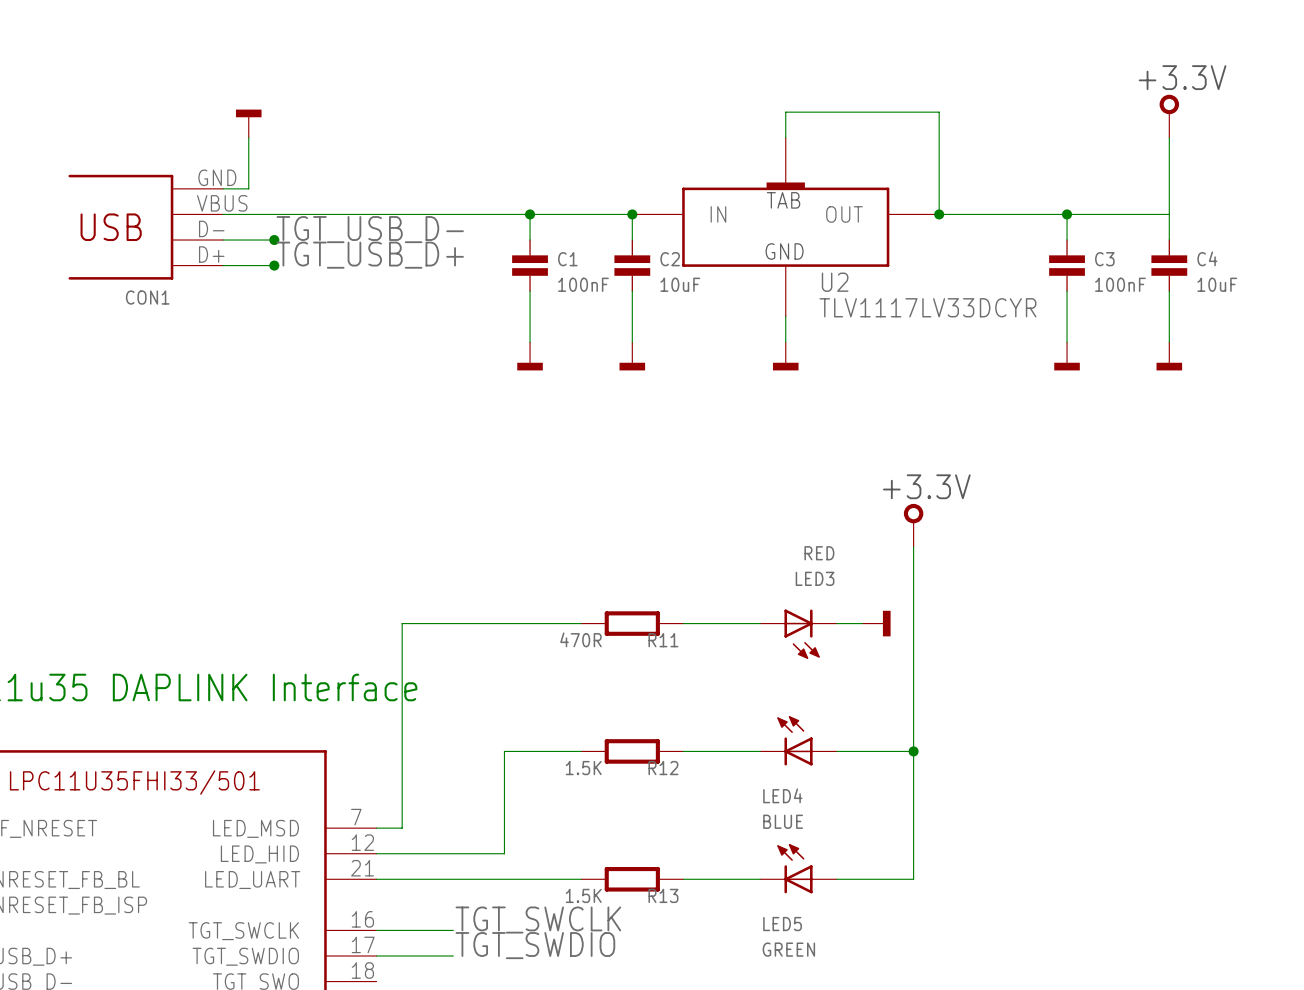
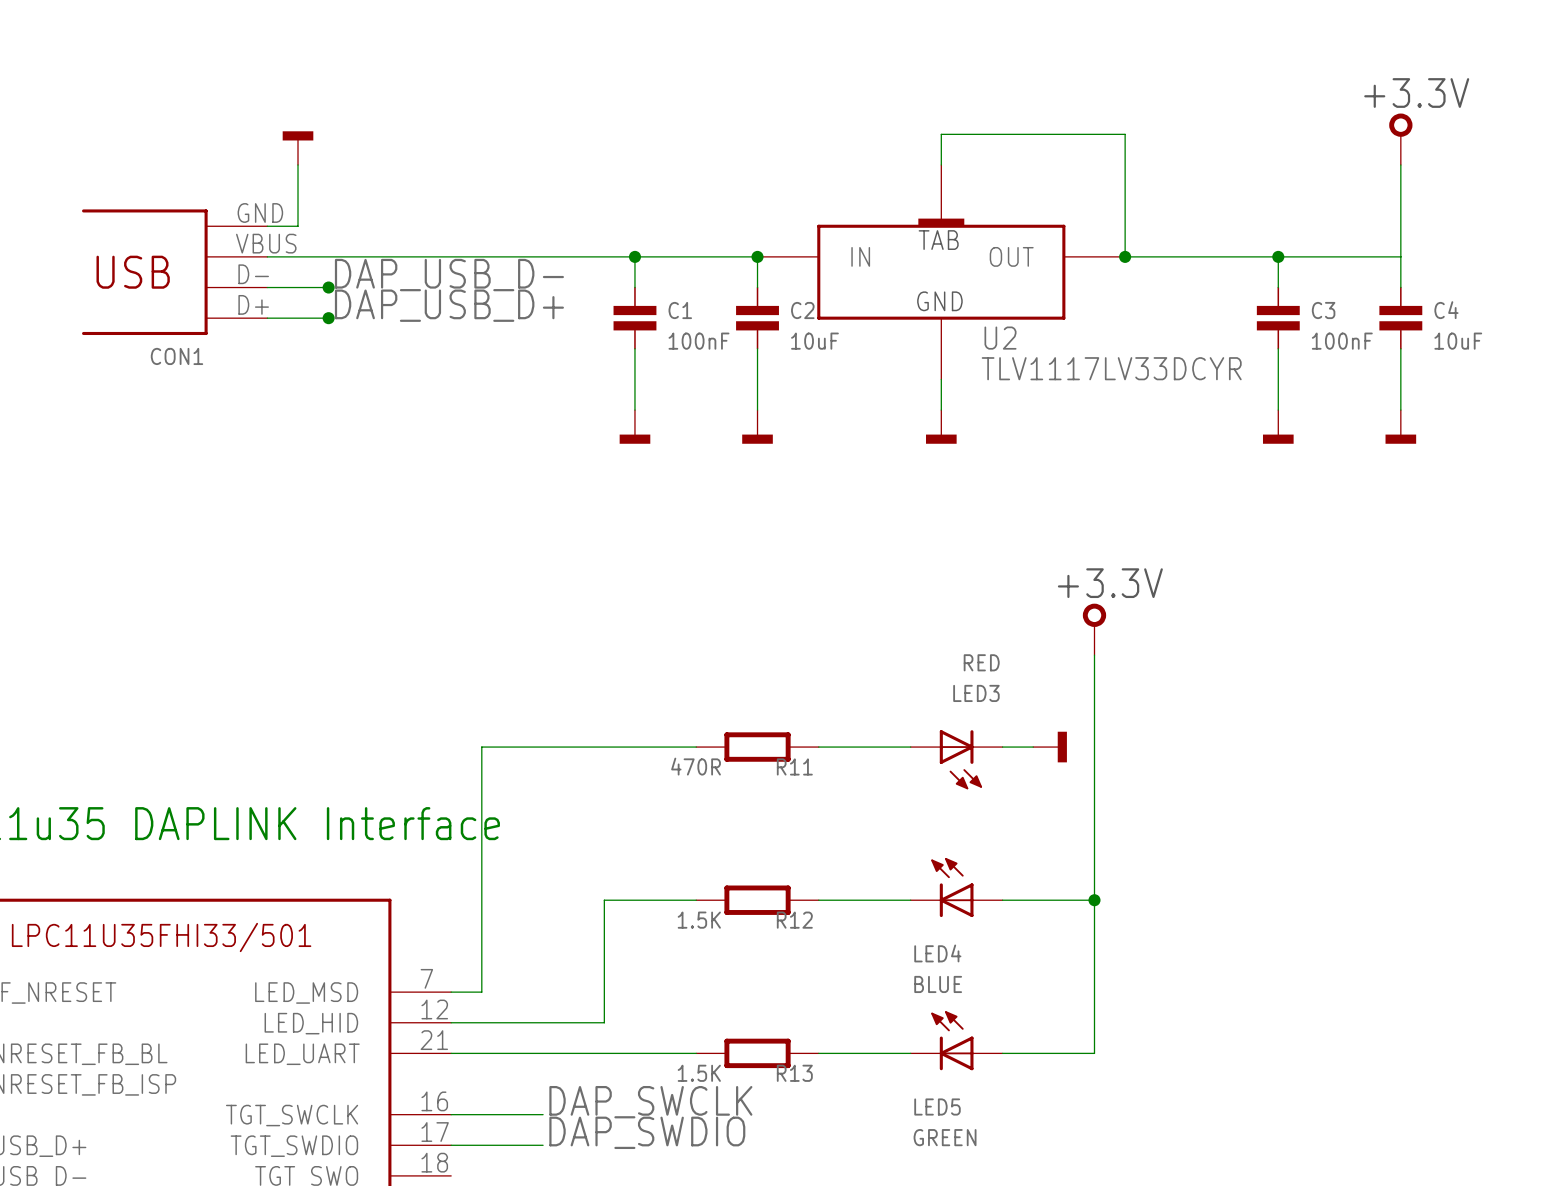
label: TGT_USB_D- (370, 229) -> DAP_USB_D- (449, 275)
label: TGT_USB_D+ (370, 255) -> DAP_USB_D+ (449, 305)
label: TGT_SWCLK (538, 920) -> DAP_SWCLK (650, 1102)
label: TGT_SWDIO (535, 945) -> DAP_SWDIO (647, 1132)

